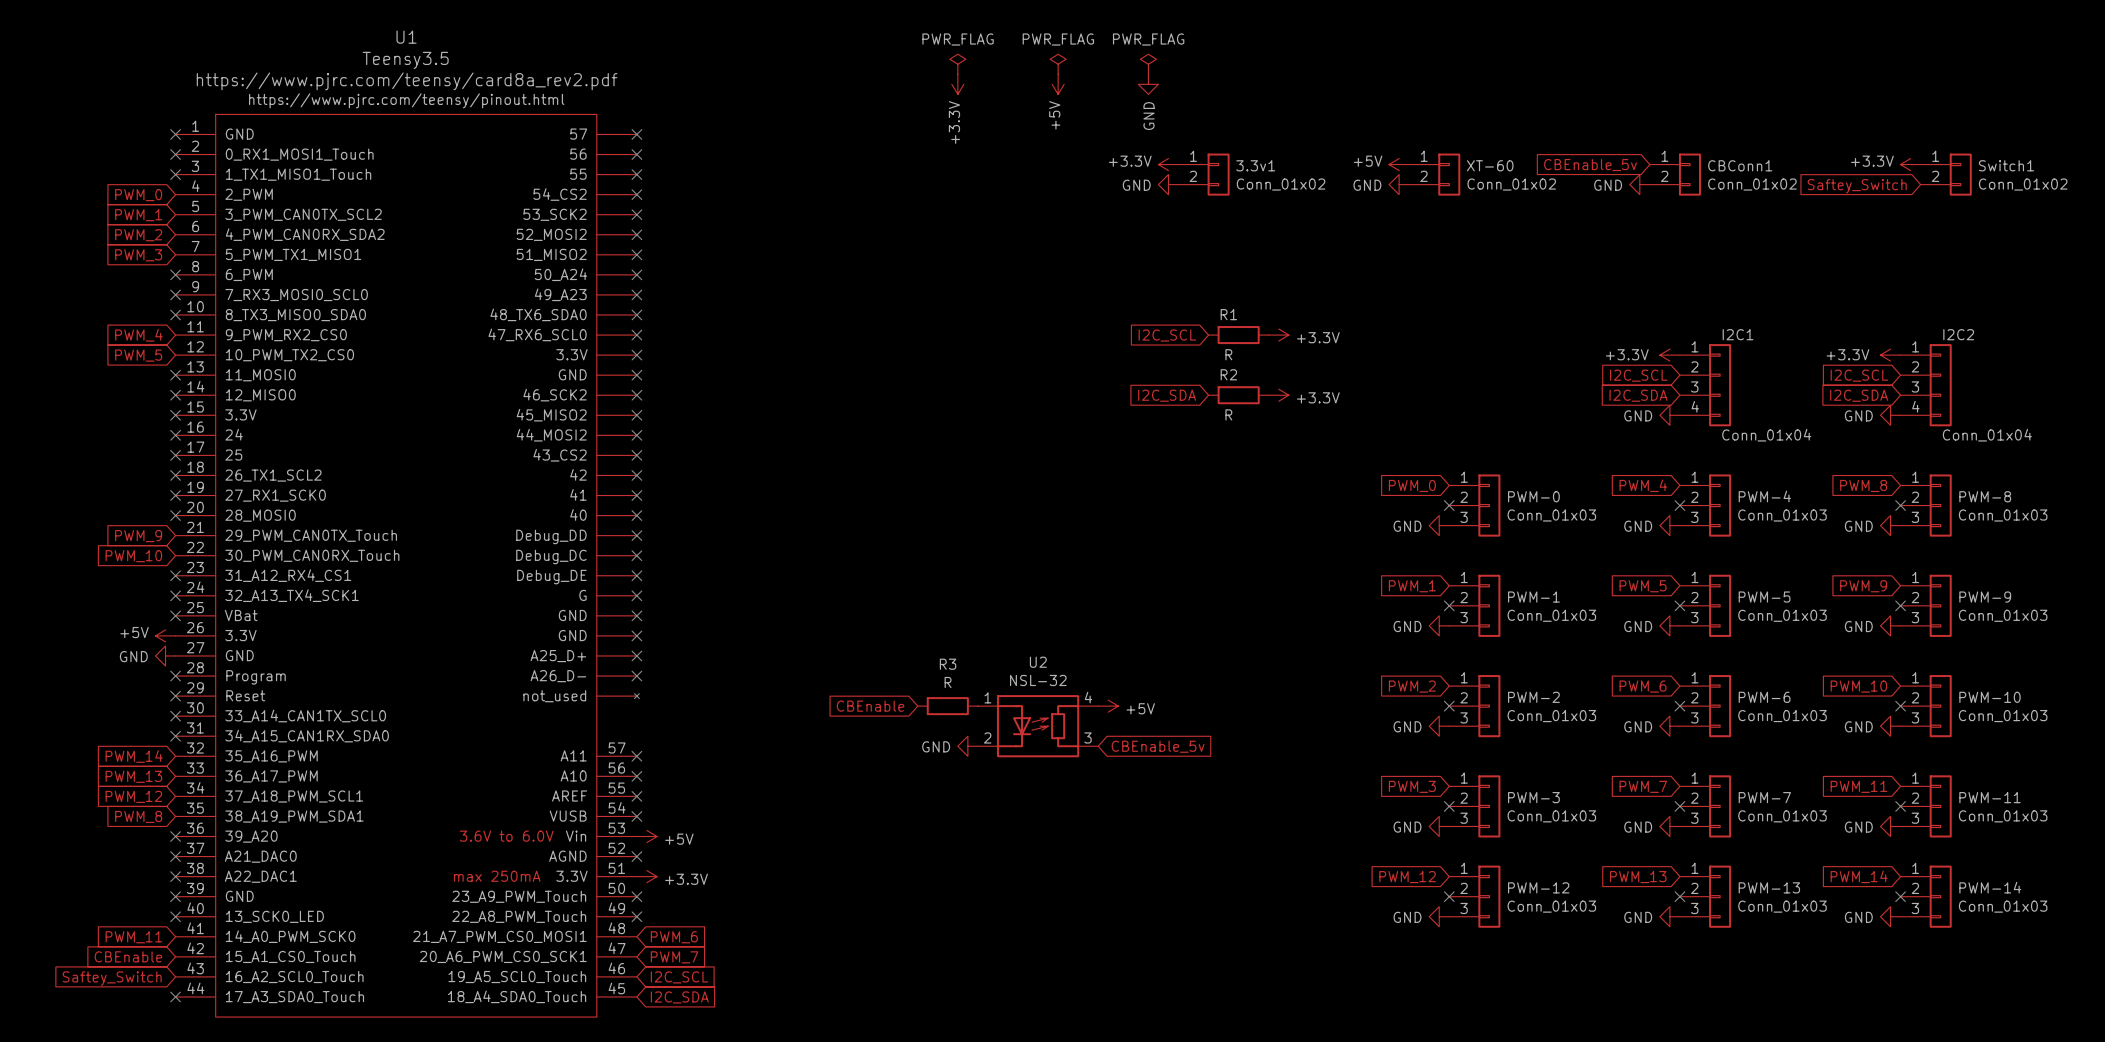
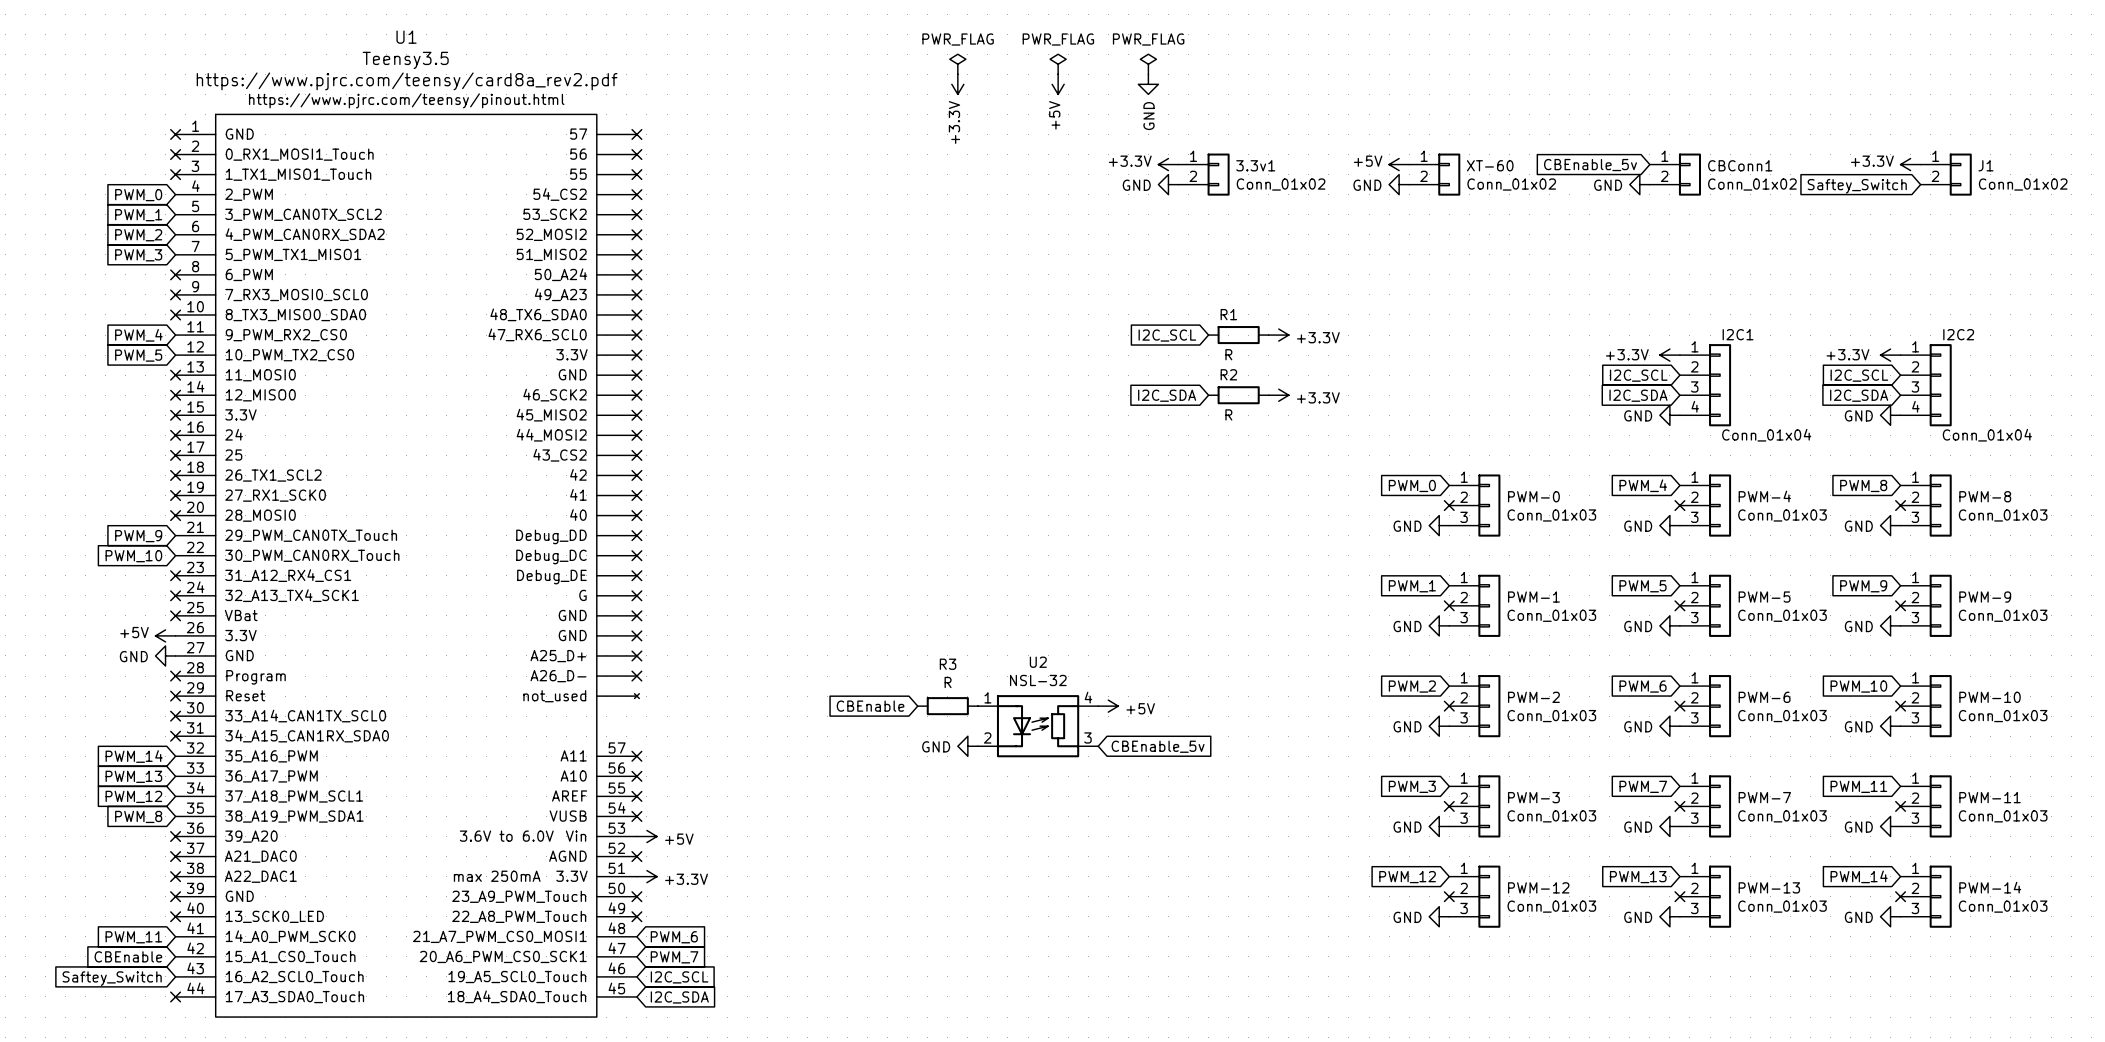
Switch1 name: Switch1 (2006, 165) -> J1 (1985, 165)

